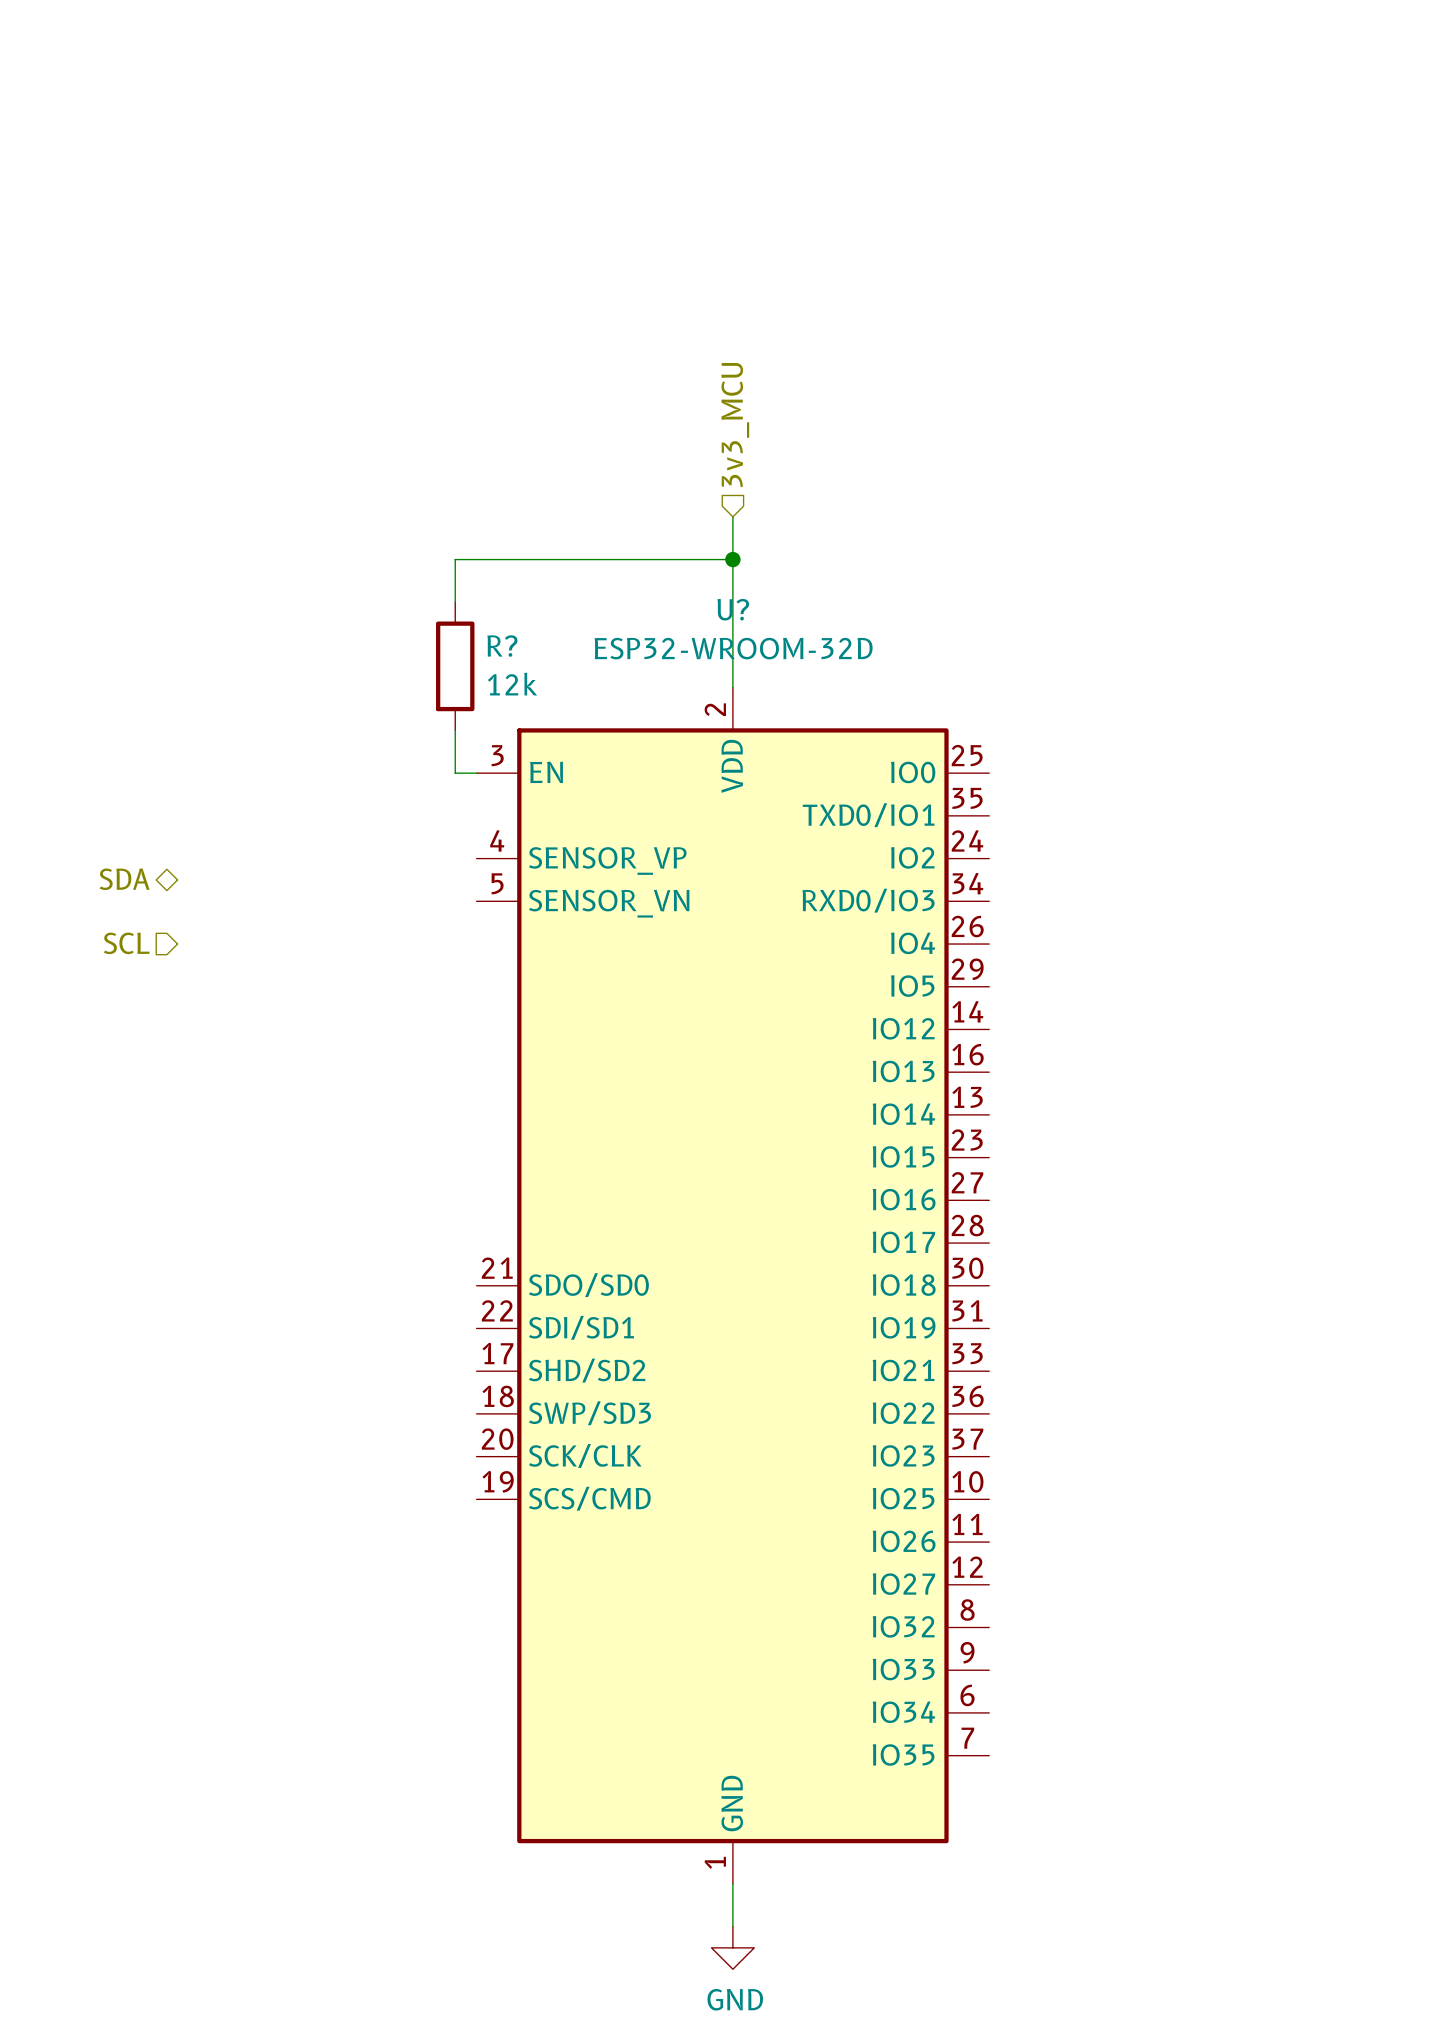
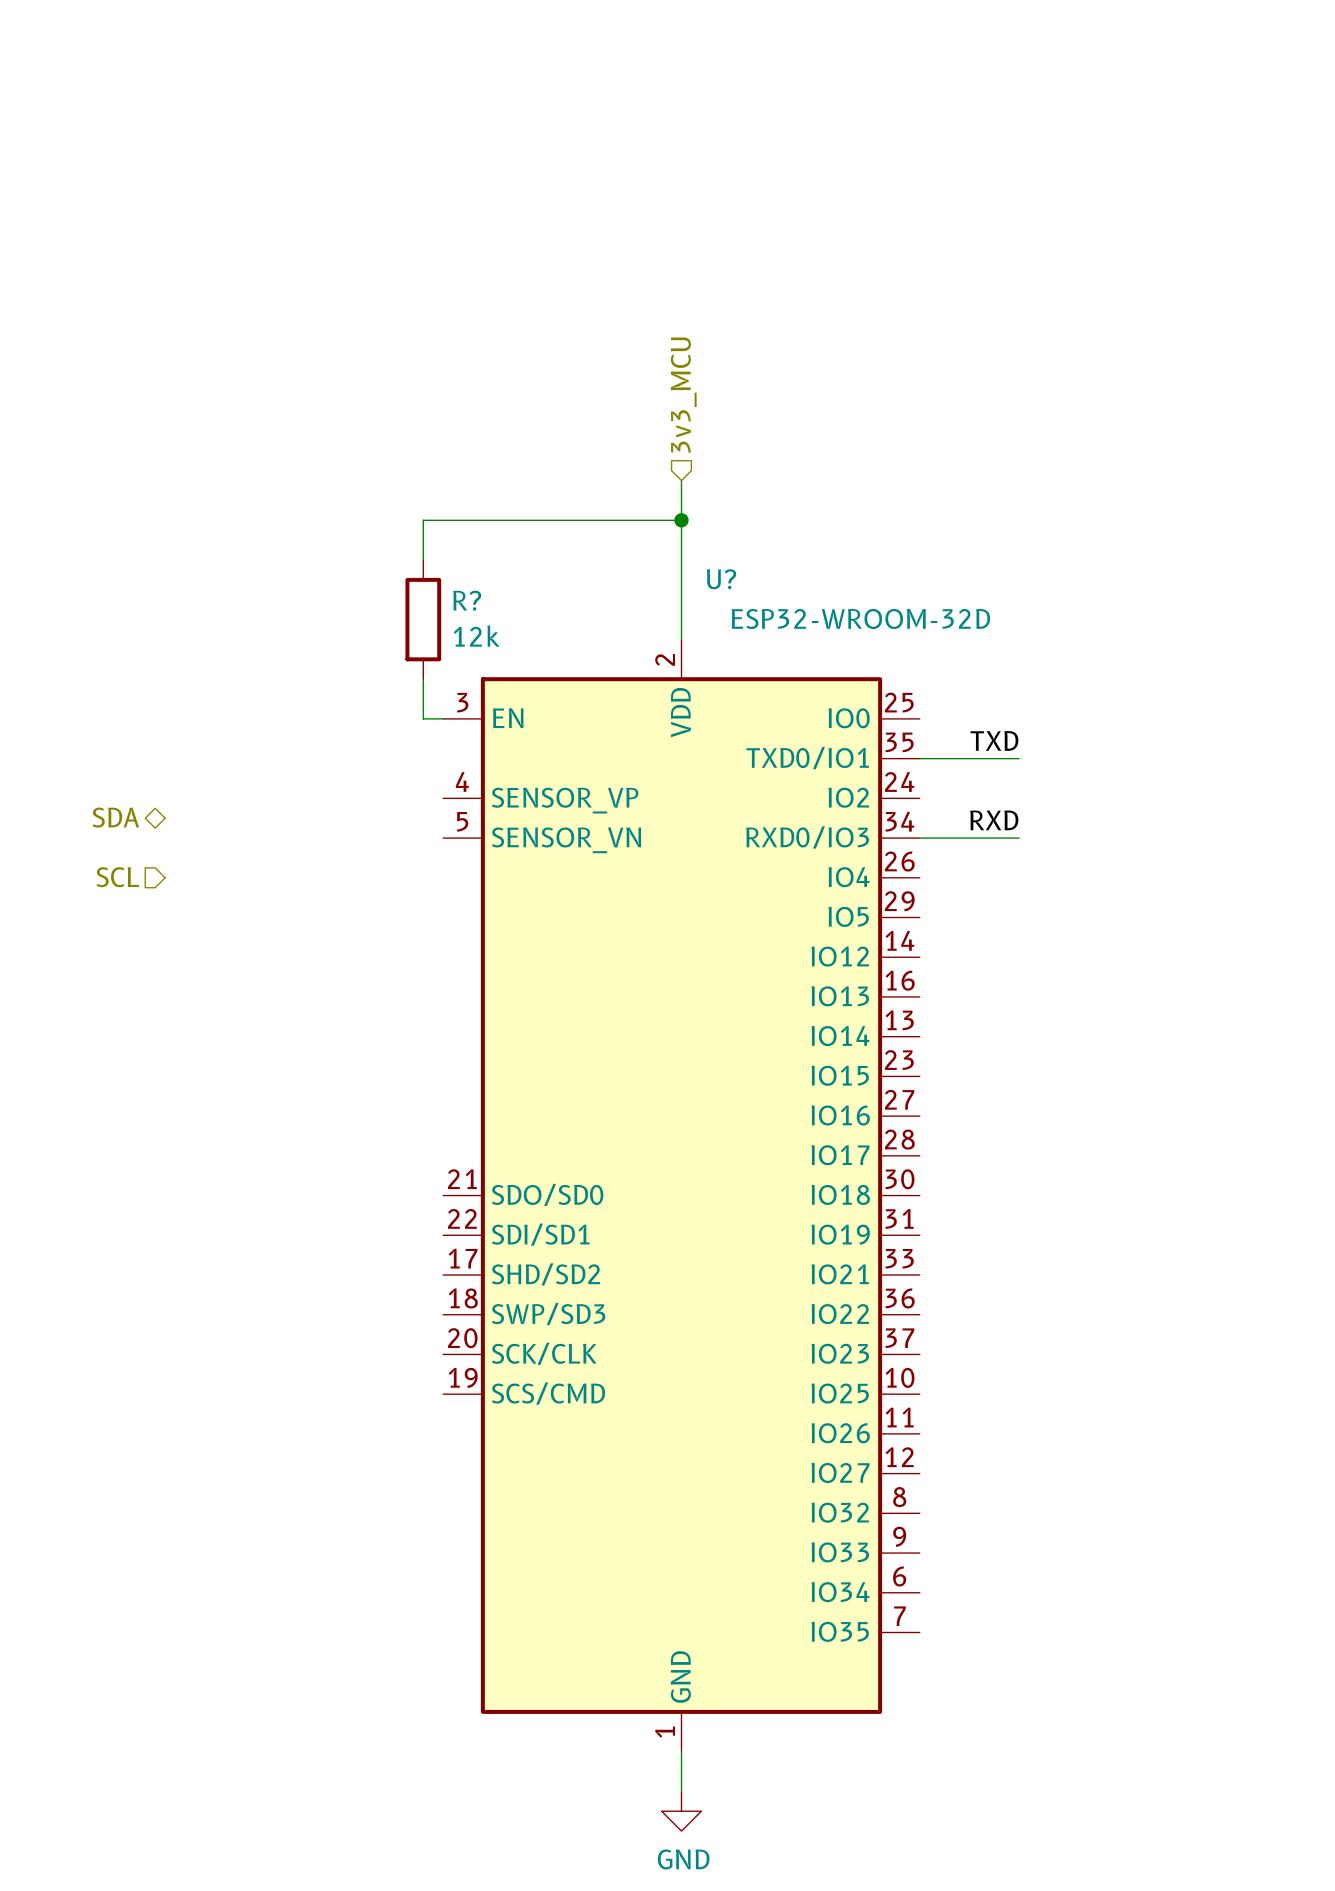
U? name position: U? (733, 609) -> U? (721, 579)
U? value position: ESP32-WROOM-32D (733, 648) -> ESP32-WROOM-32D (860, 618)
label: none -> TXD (994, 740)
wire: none -> (919, 758) (1019, 758)
label: none -> RXD (994, 820)
wire: none -> (919, 838) (1019, 838)

